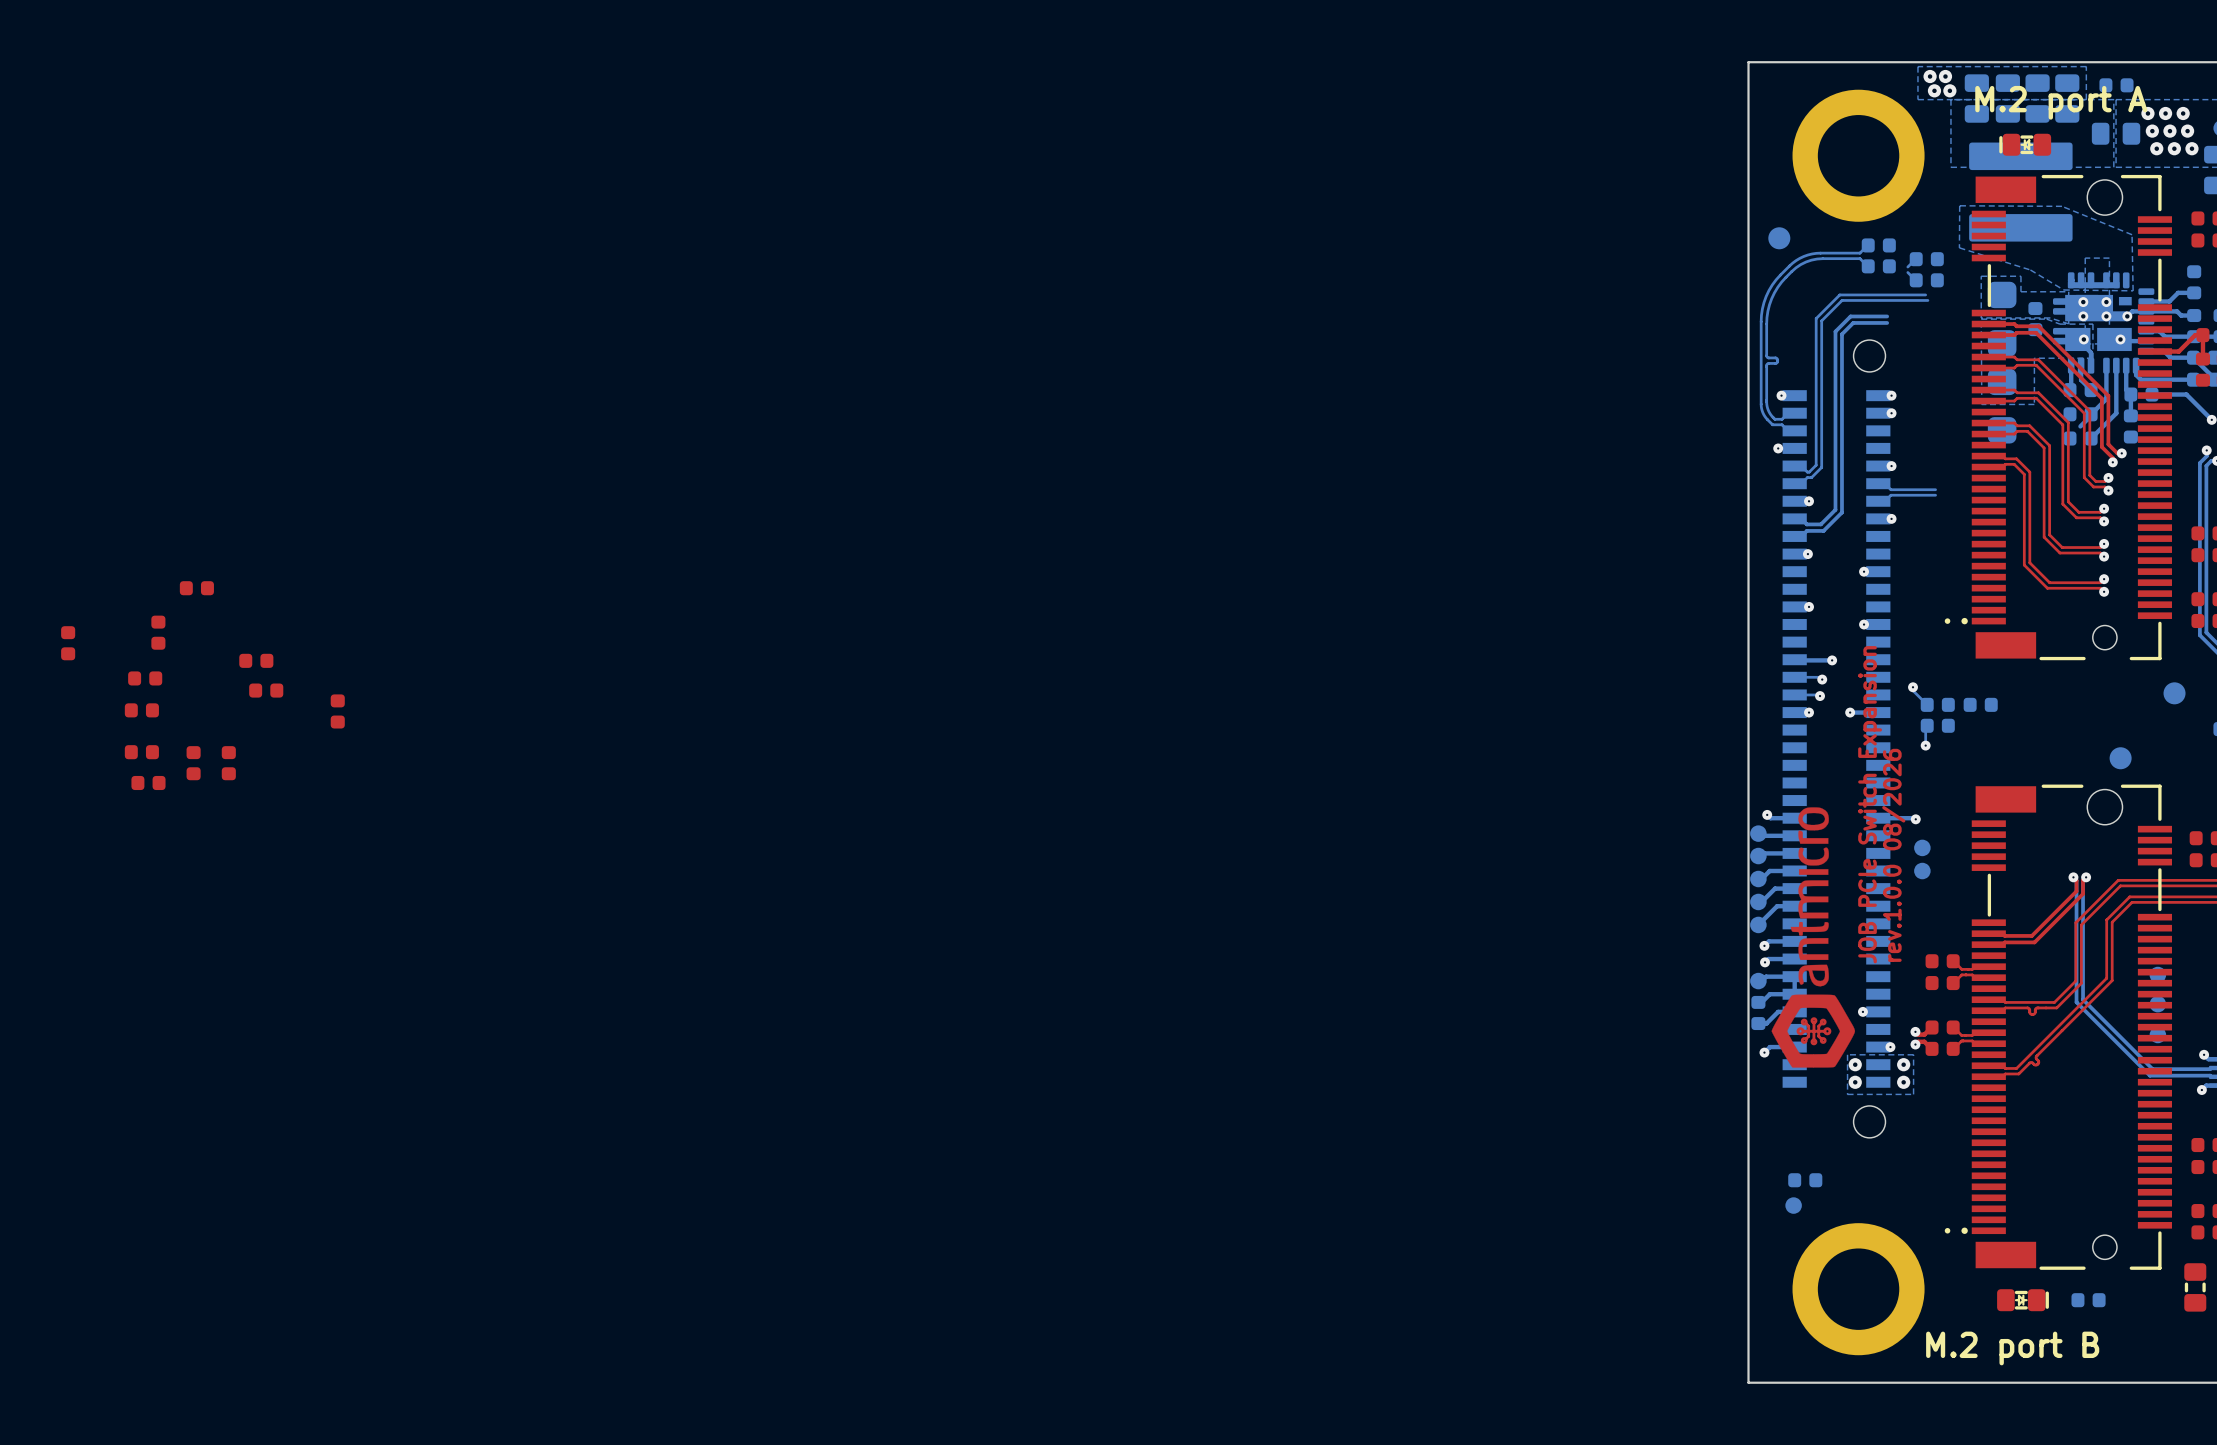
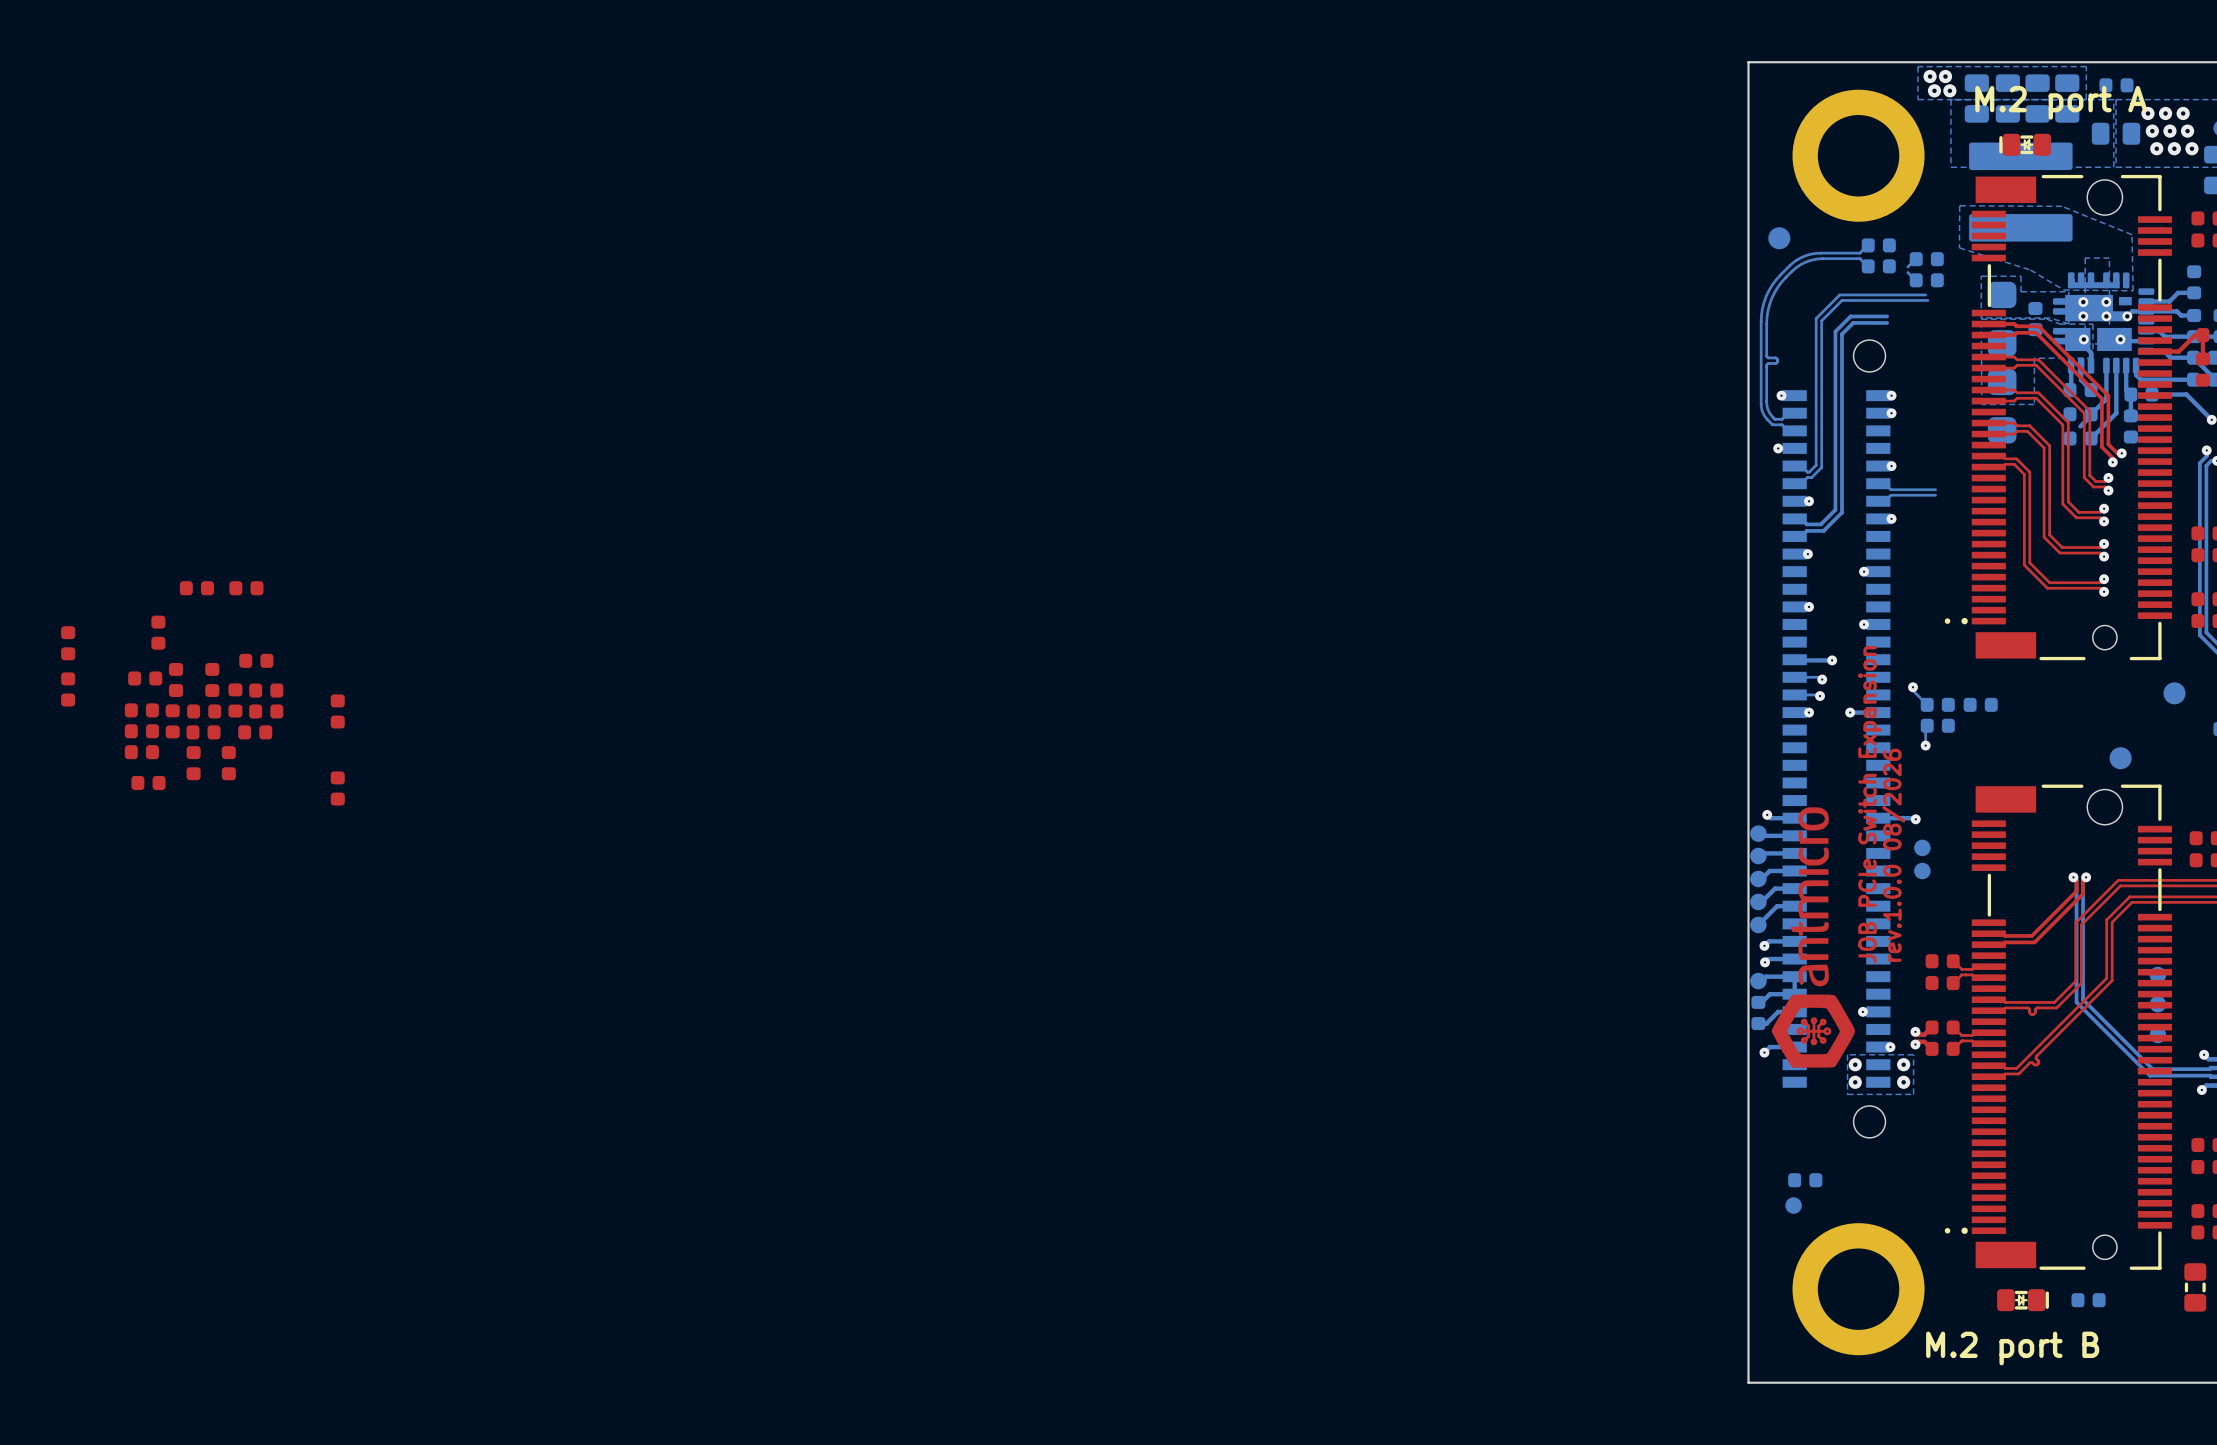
part: none -> (246, 588)
part: none -> (176, 679)
part: none -> (212, 679)
part: none -> (68, 689)
part: none -> (235, 700)
part: none -> (204, 711)
part: none -> (266, 711)
part: none -> (172, 721)
part: none -> (141, 731)
part: none -> (203, 732)
part: none -> (255, 732)
part: none -> (337, 788)

